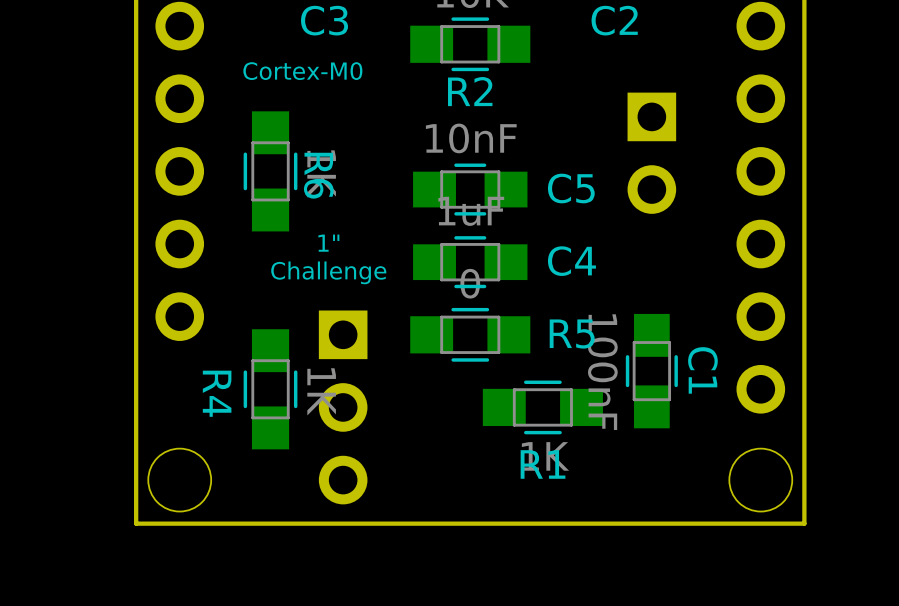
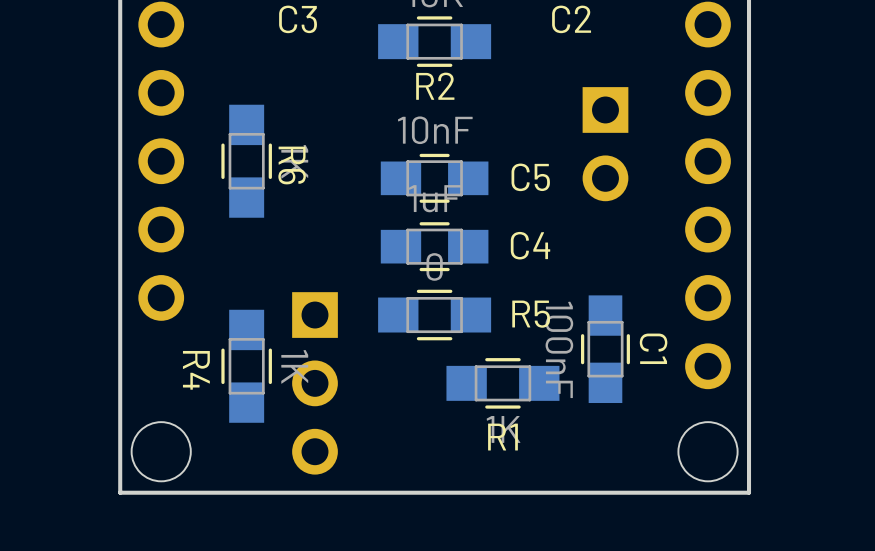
text: Cortex-M0 (302, 71) -> none
text: 1" (328, 243) -> none
text: Challenge (328, 272) -> none

